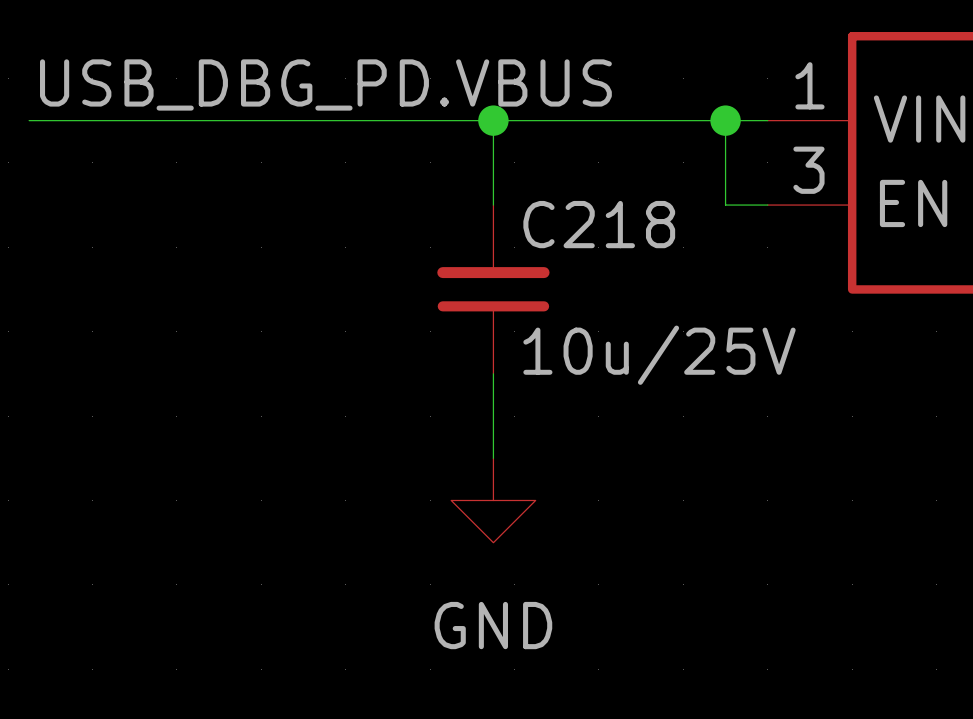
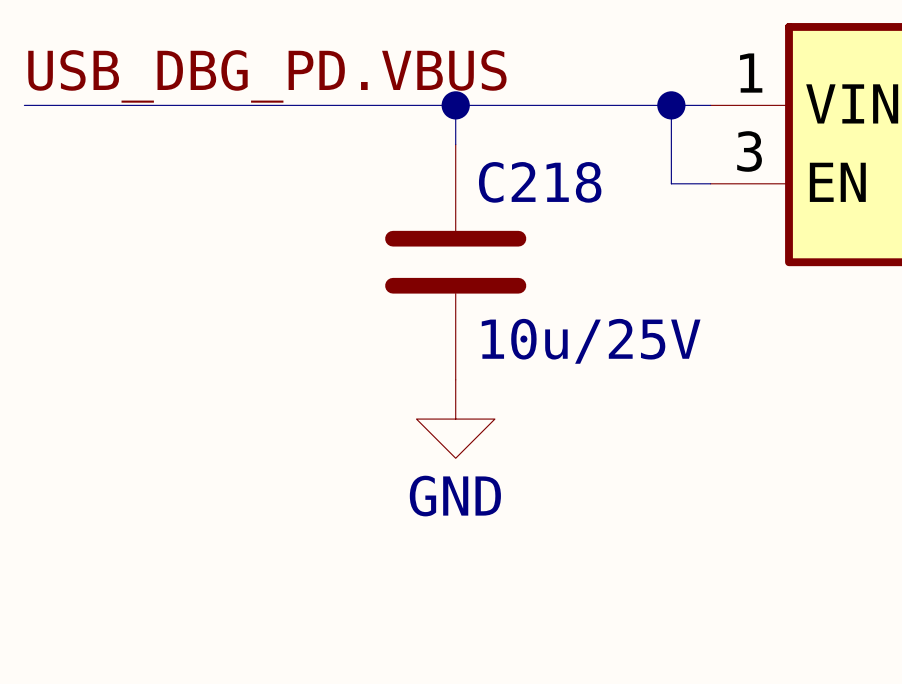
C218 symbol: [437, 205, 550, 374] -> [385, 144, 527, 380]
power symbol position: GND (493, 500) -> GND (455, 419)
power symbol text position: GND (493, 625) -> GND (455, 496)

